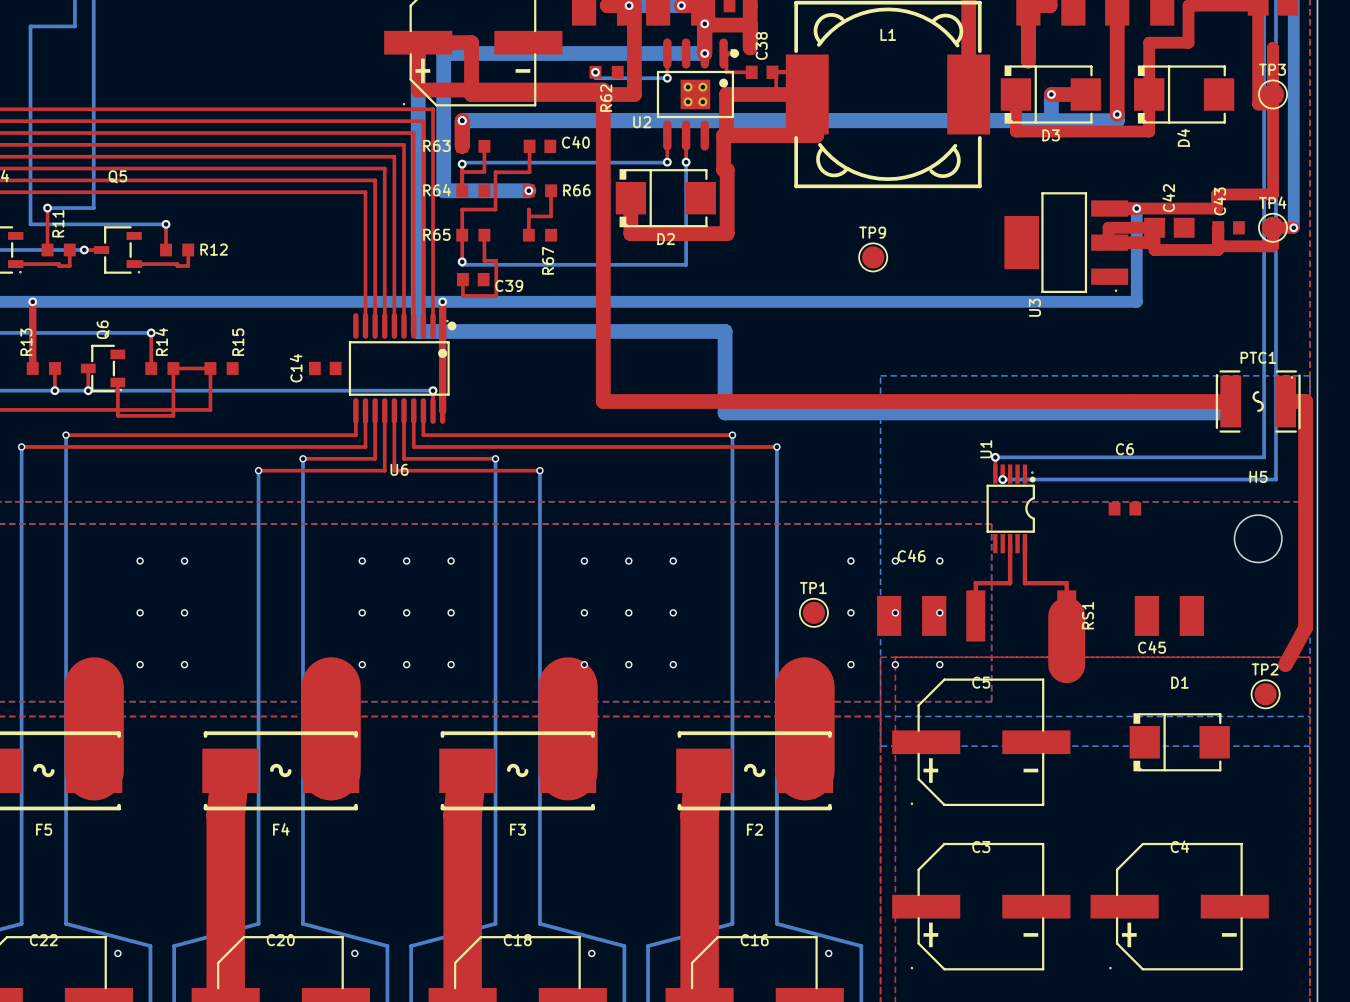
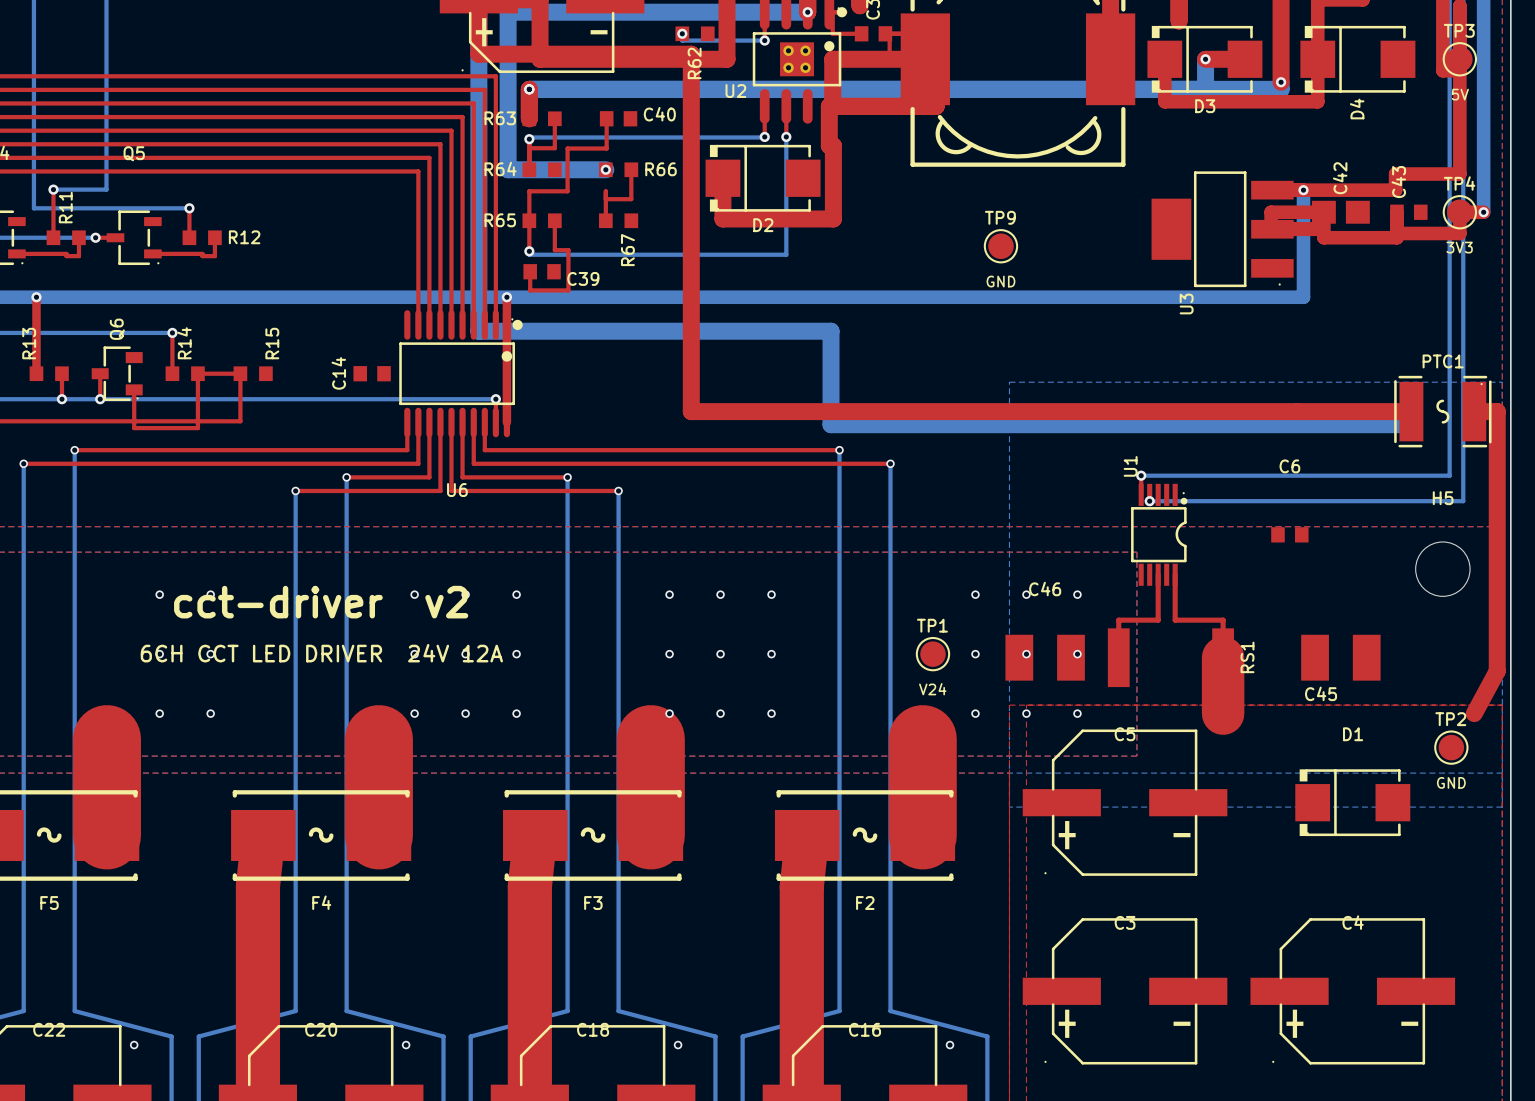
text: none -> 5V (1460, 94)
text: none -> 3V3 (1459, 247)
text: none -> GND (1000, 281)
text: none -> cct-driver v2 (321, 602)
text: none -> 6CH CCT LED DRIVER 24V 12A (321, 653)
text: none -> V24 (932, 689)
text: none -> GND (1451, 782)

